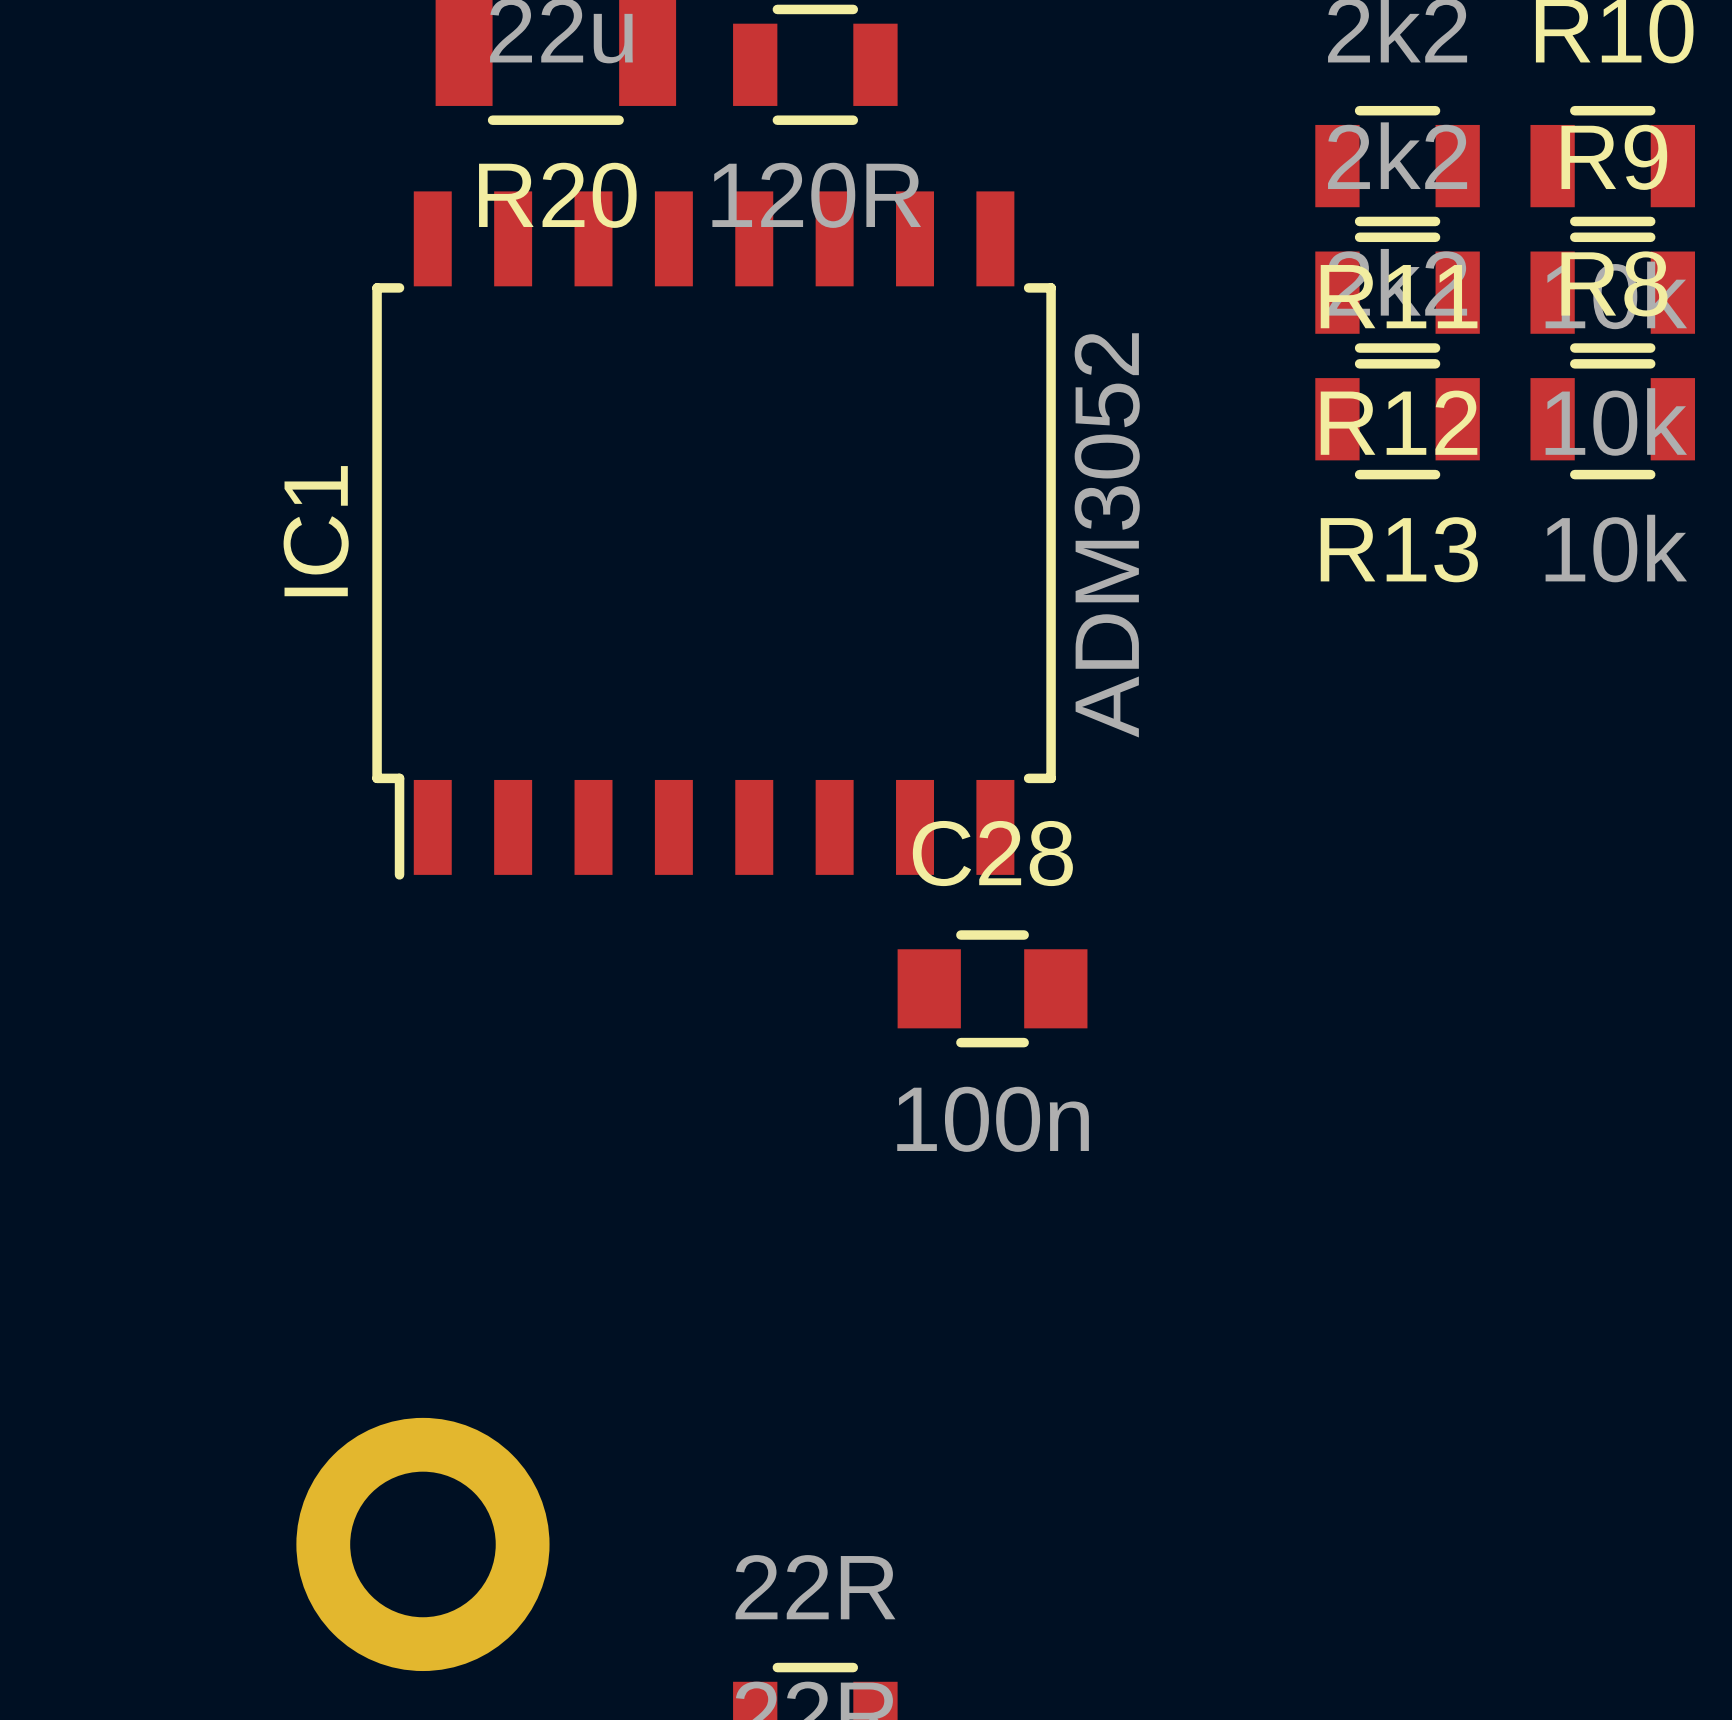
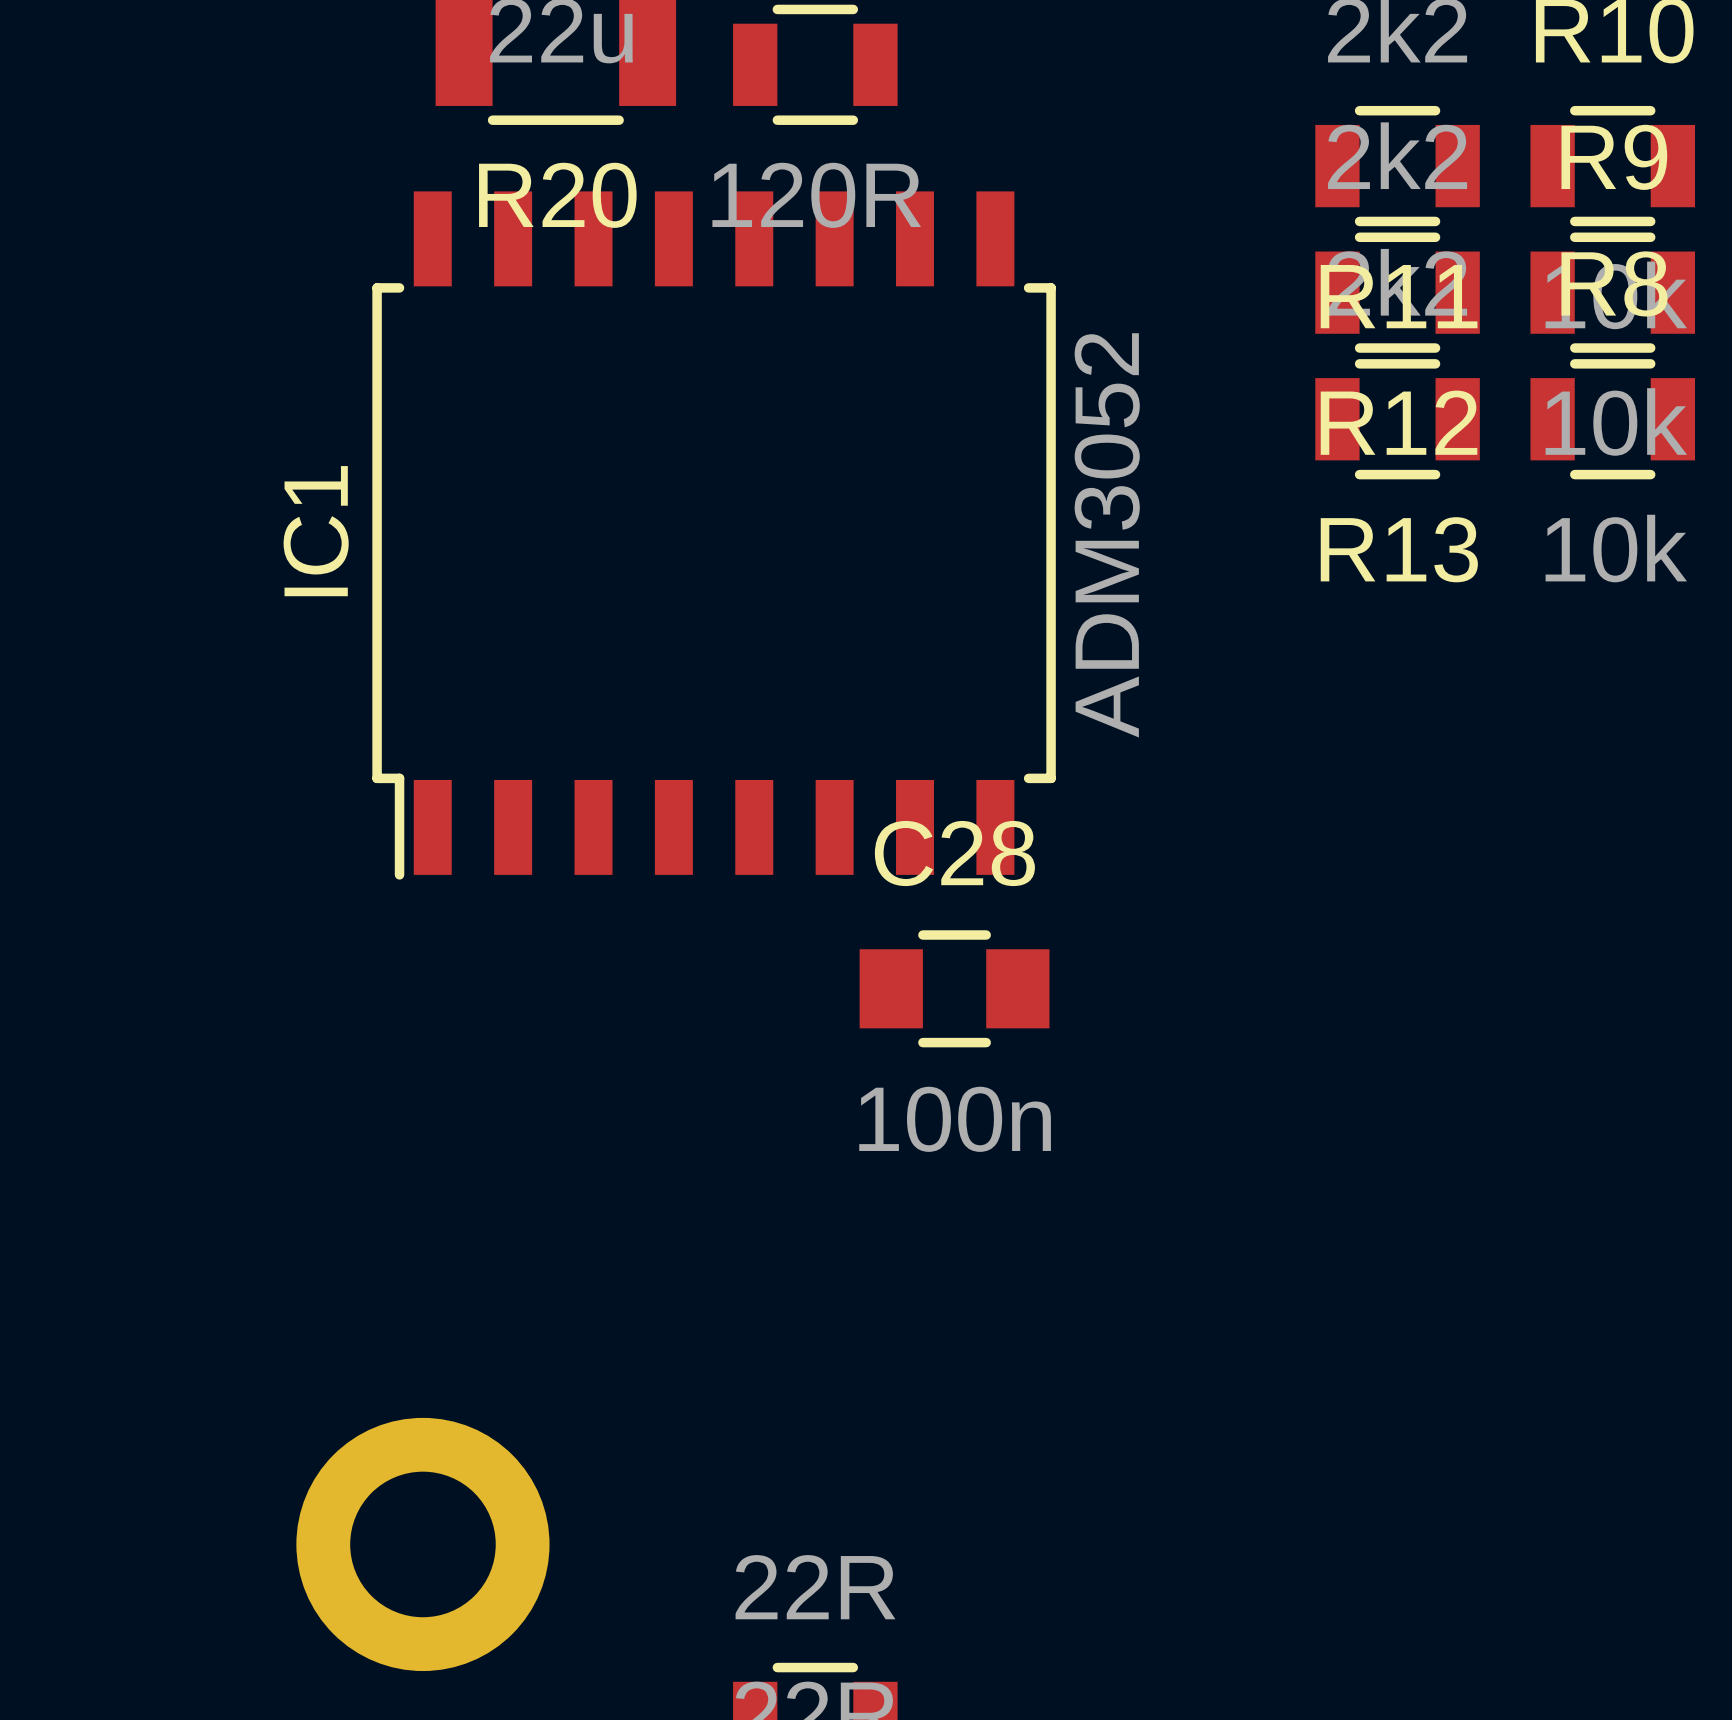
C28 position: (992, 988) -> (954, 988)

